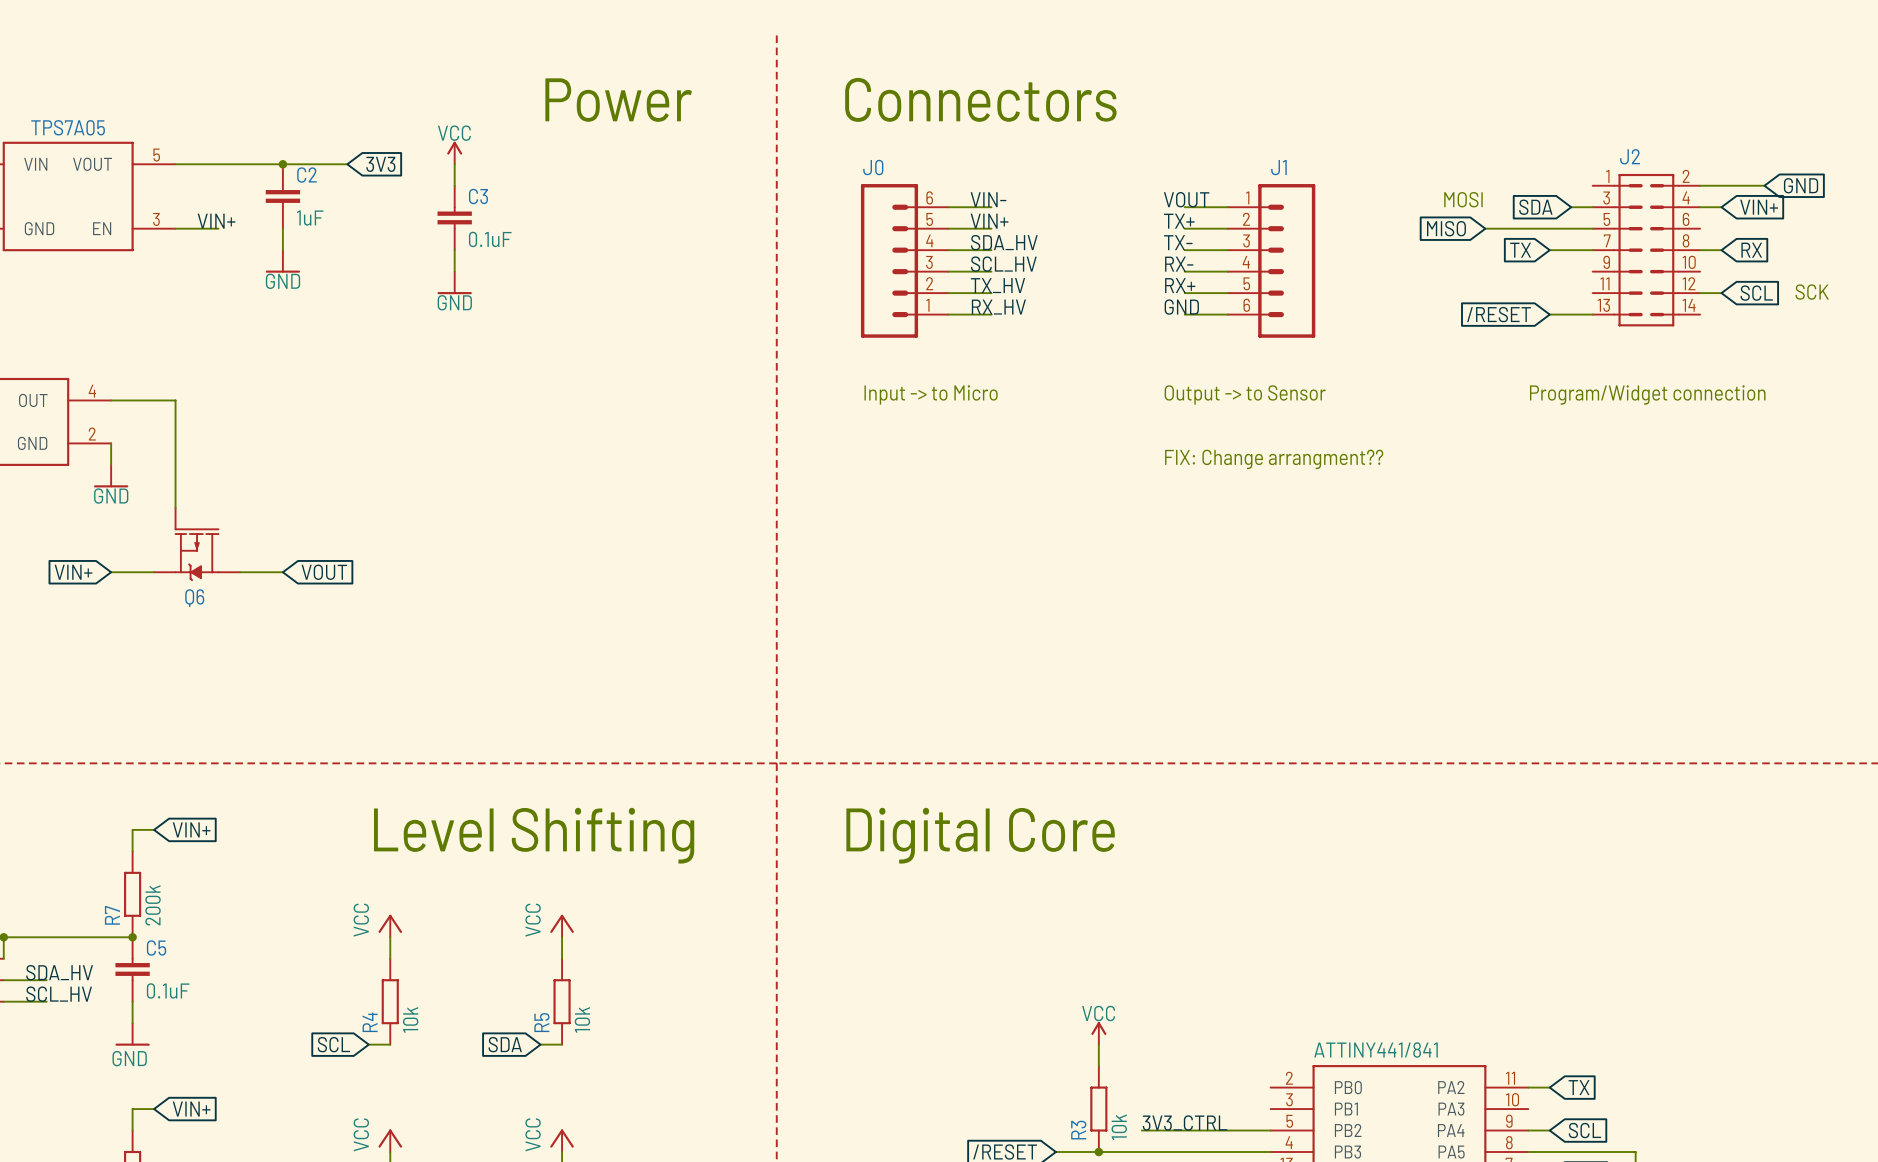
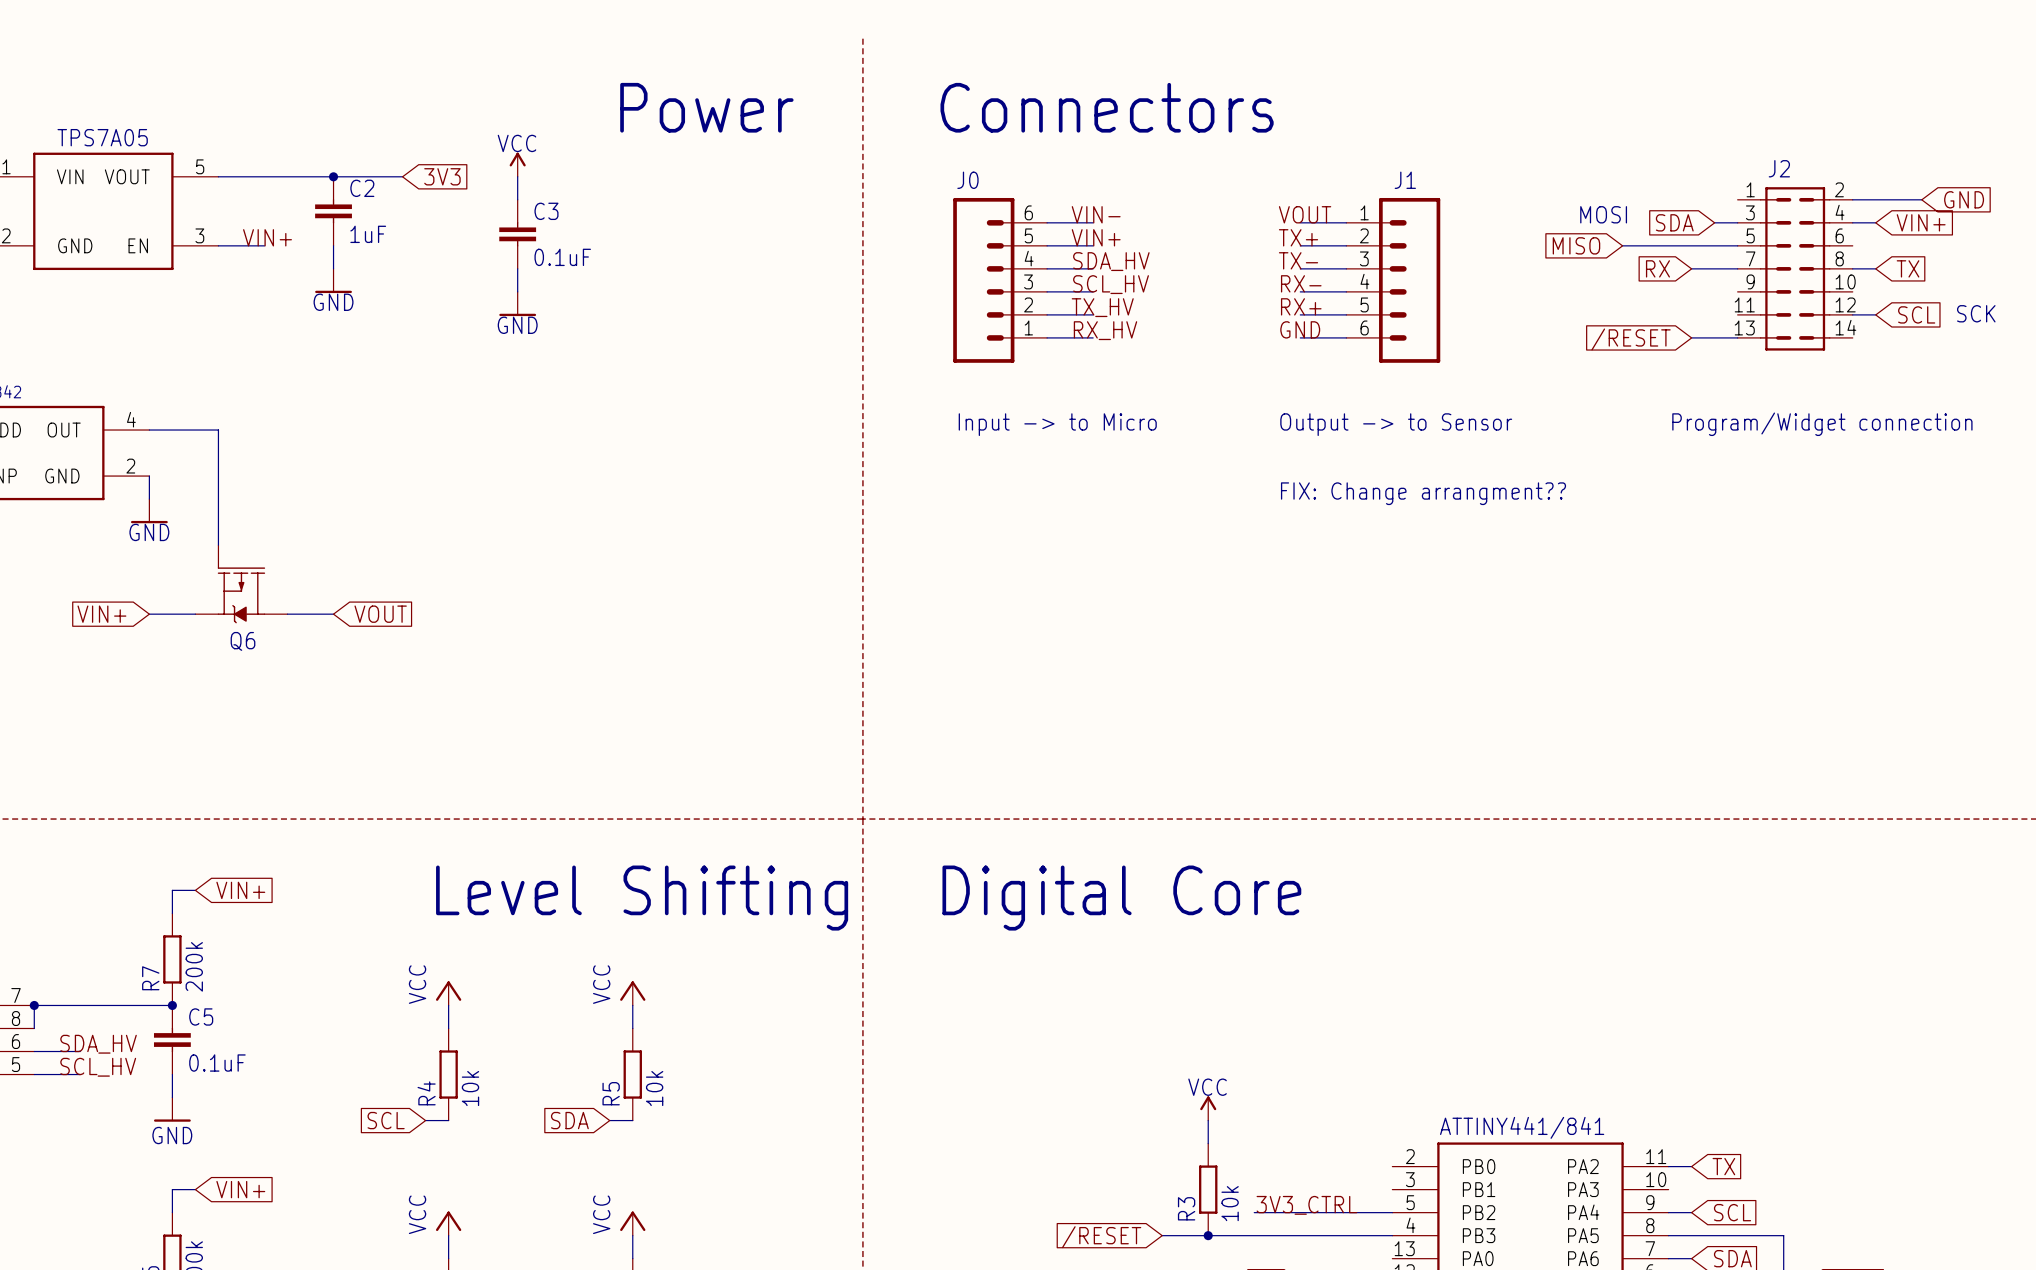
global label: TX (1520, 250) -> RX (1657, 268)
global label: RX (1751, 250) -> TX (1908, 268)

